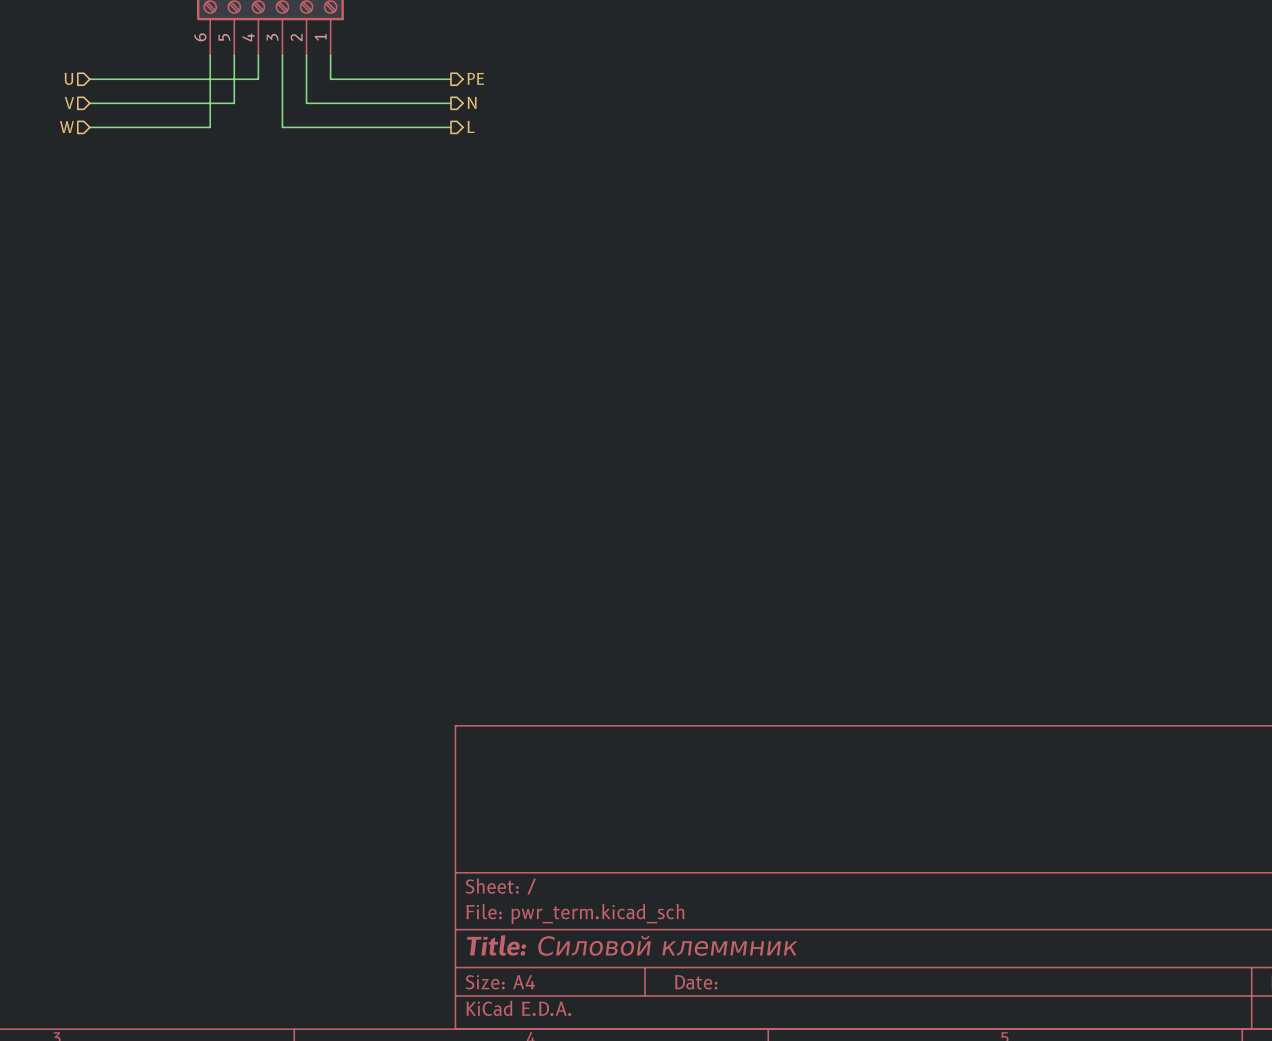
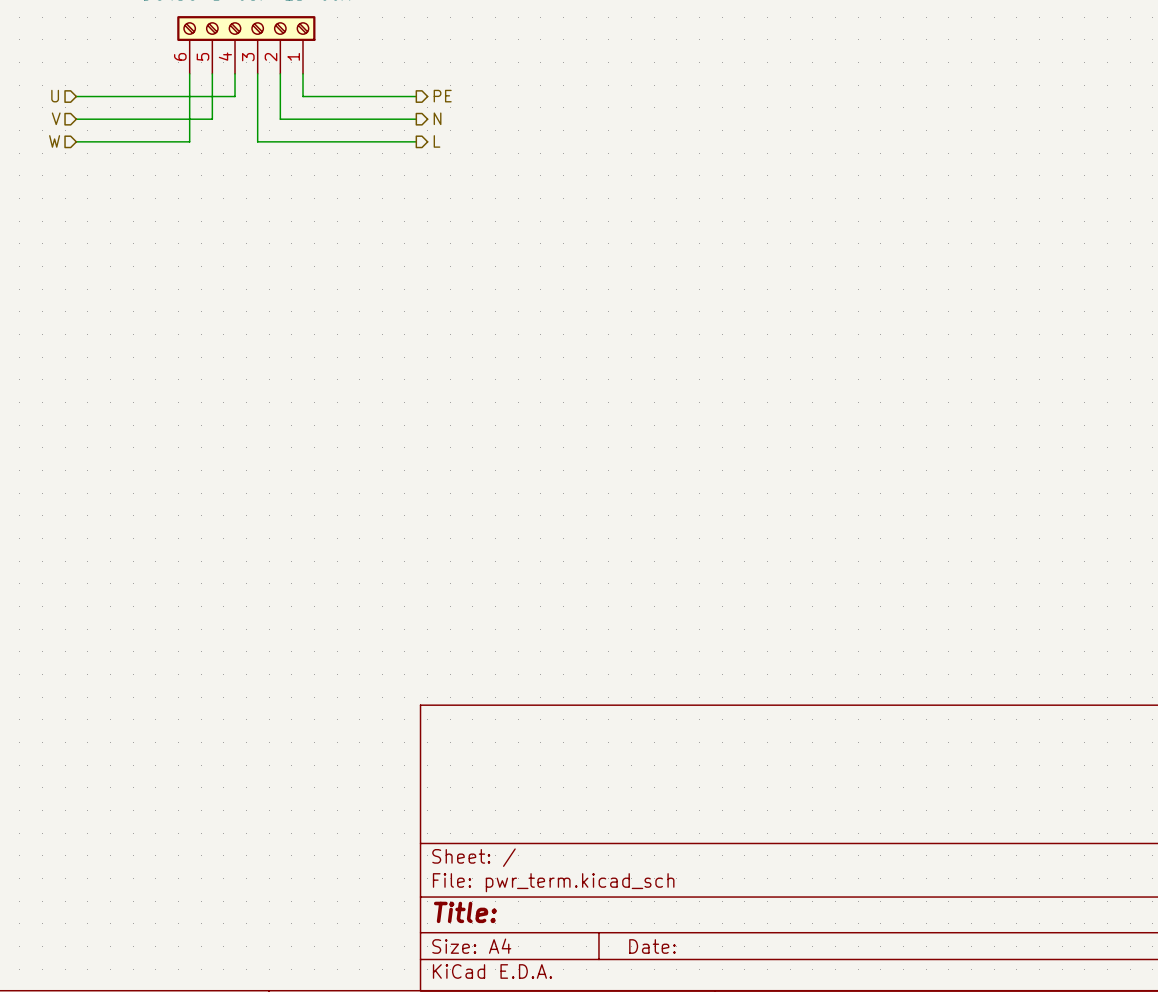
title block: Title: Силовой клеммник (632, 945) -> Title: (465, 912)

